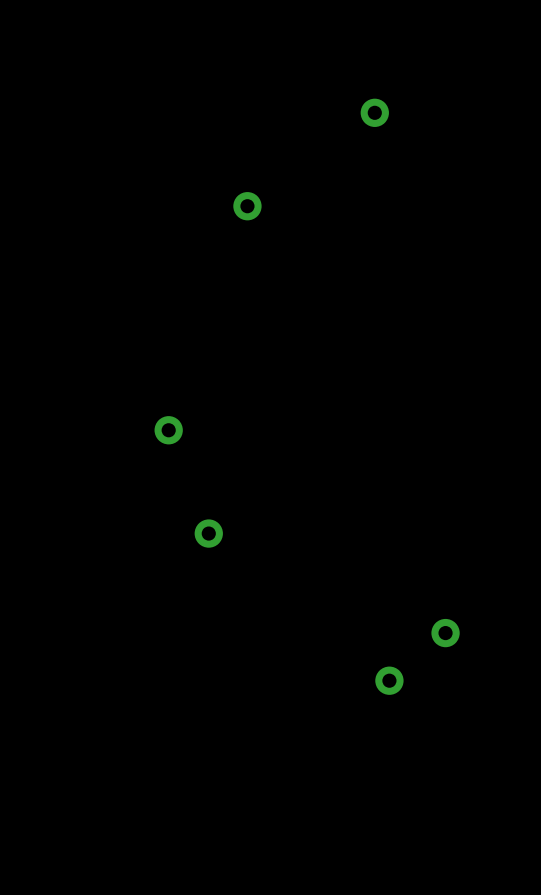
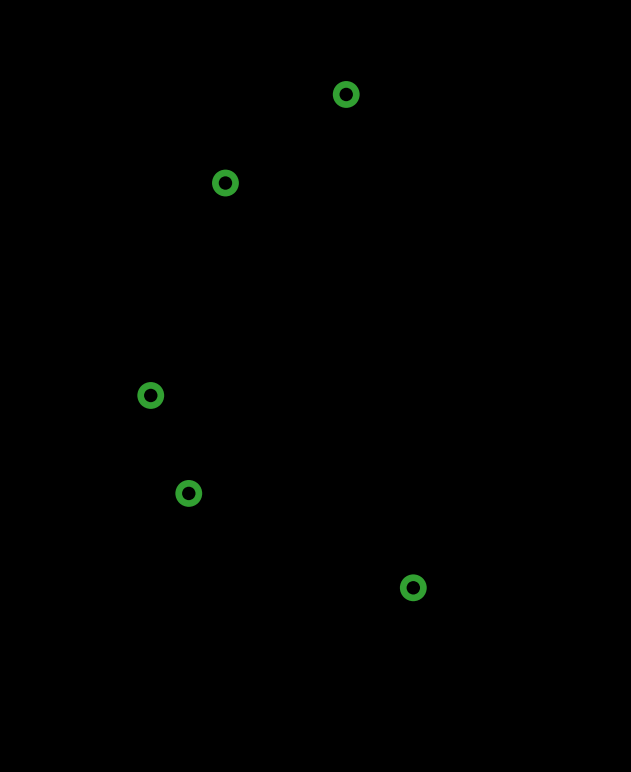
via: (389, 680) -> none

